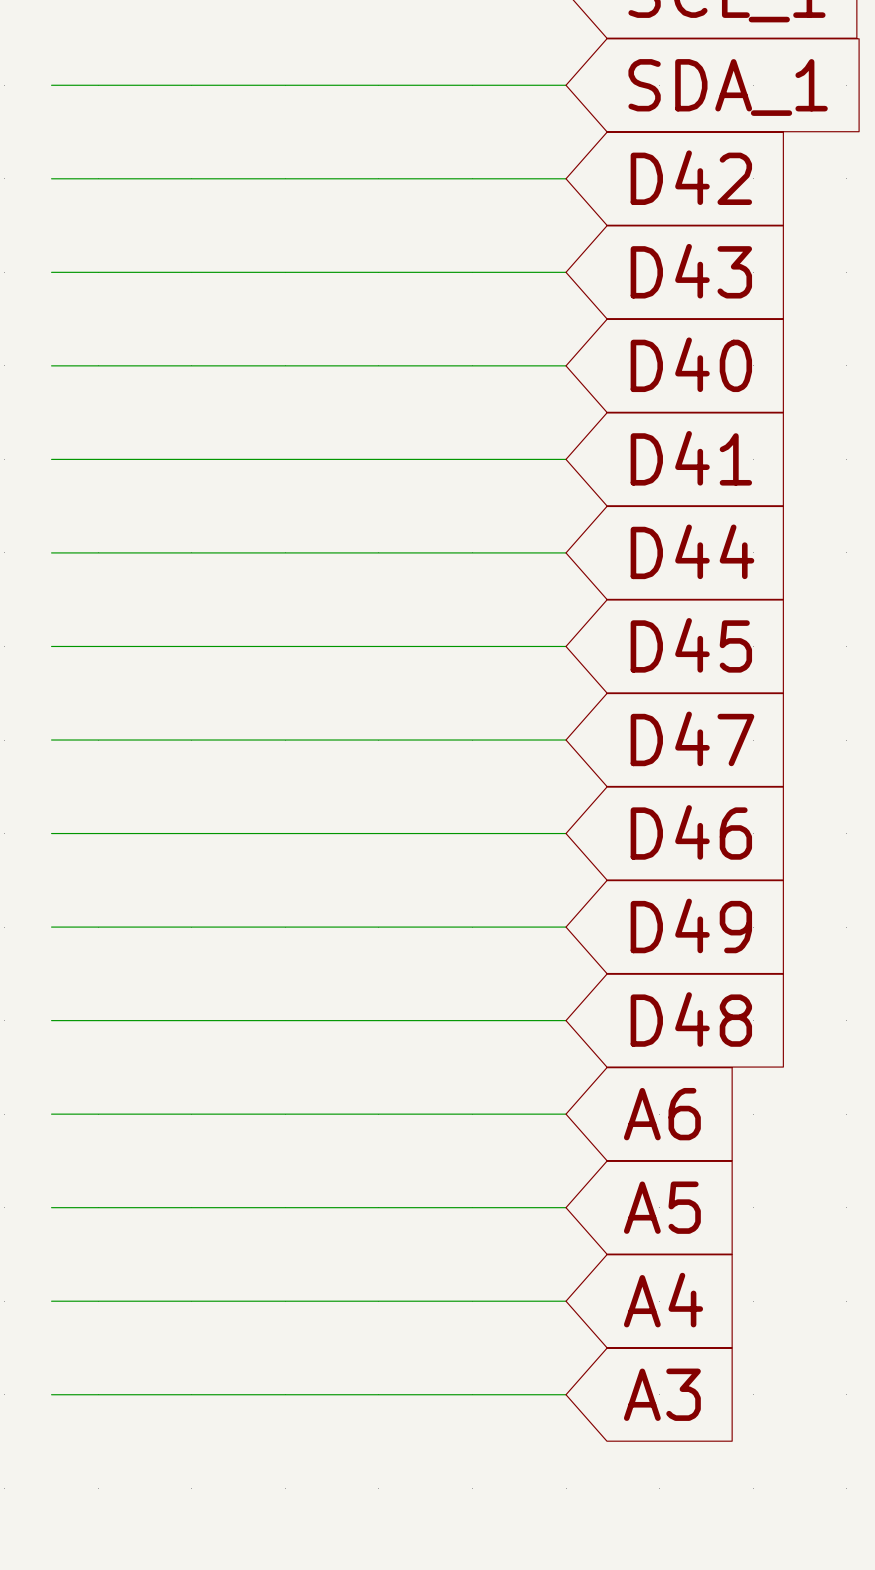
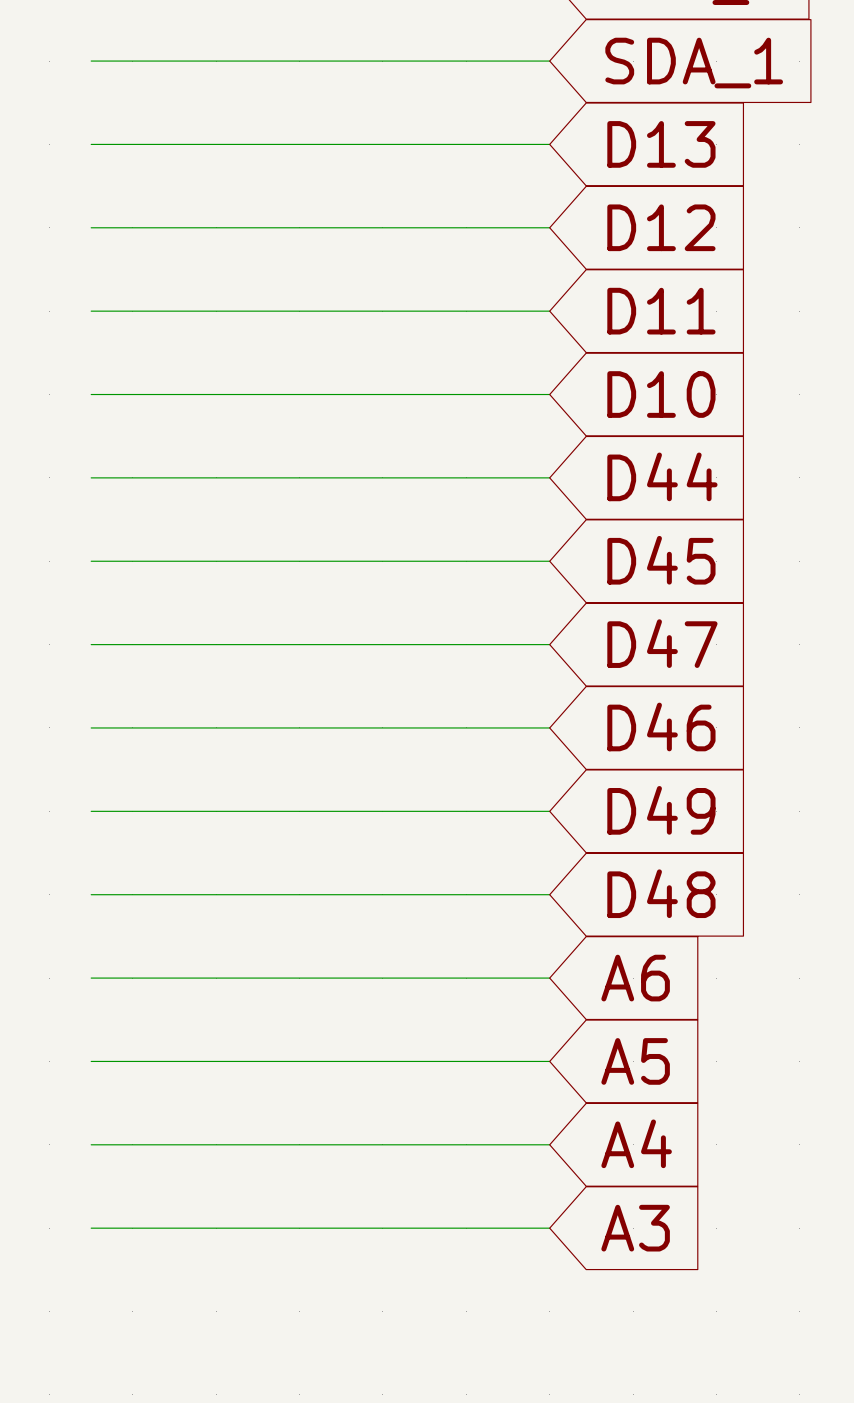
global label: D42 (691, 177) -> D13 (661, 144)
global label: D43 (691, 271) -> D12 (661, 227)
global label: D40 (691, 364) -> D11 (661, 311)
global label: D41 (691, 458) -> D10 (661, 394)

